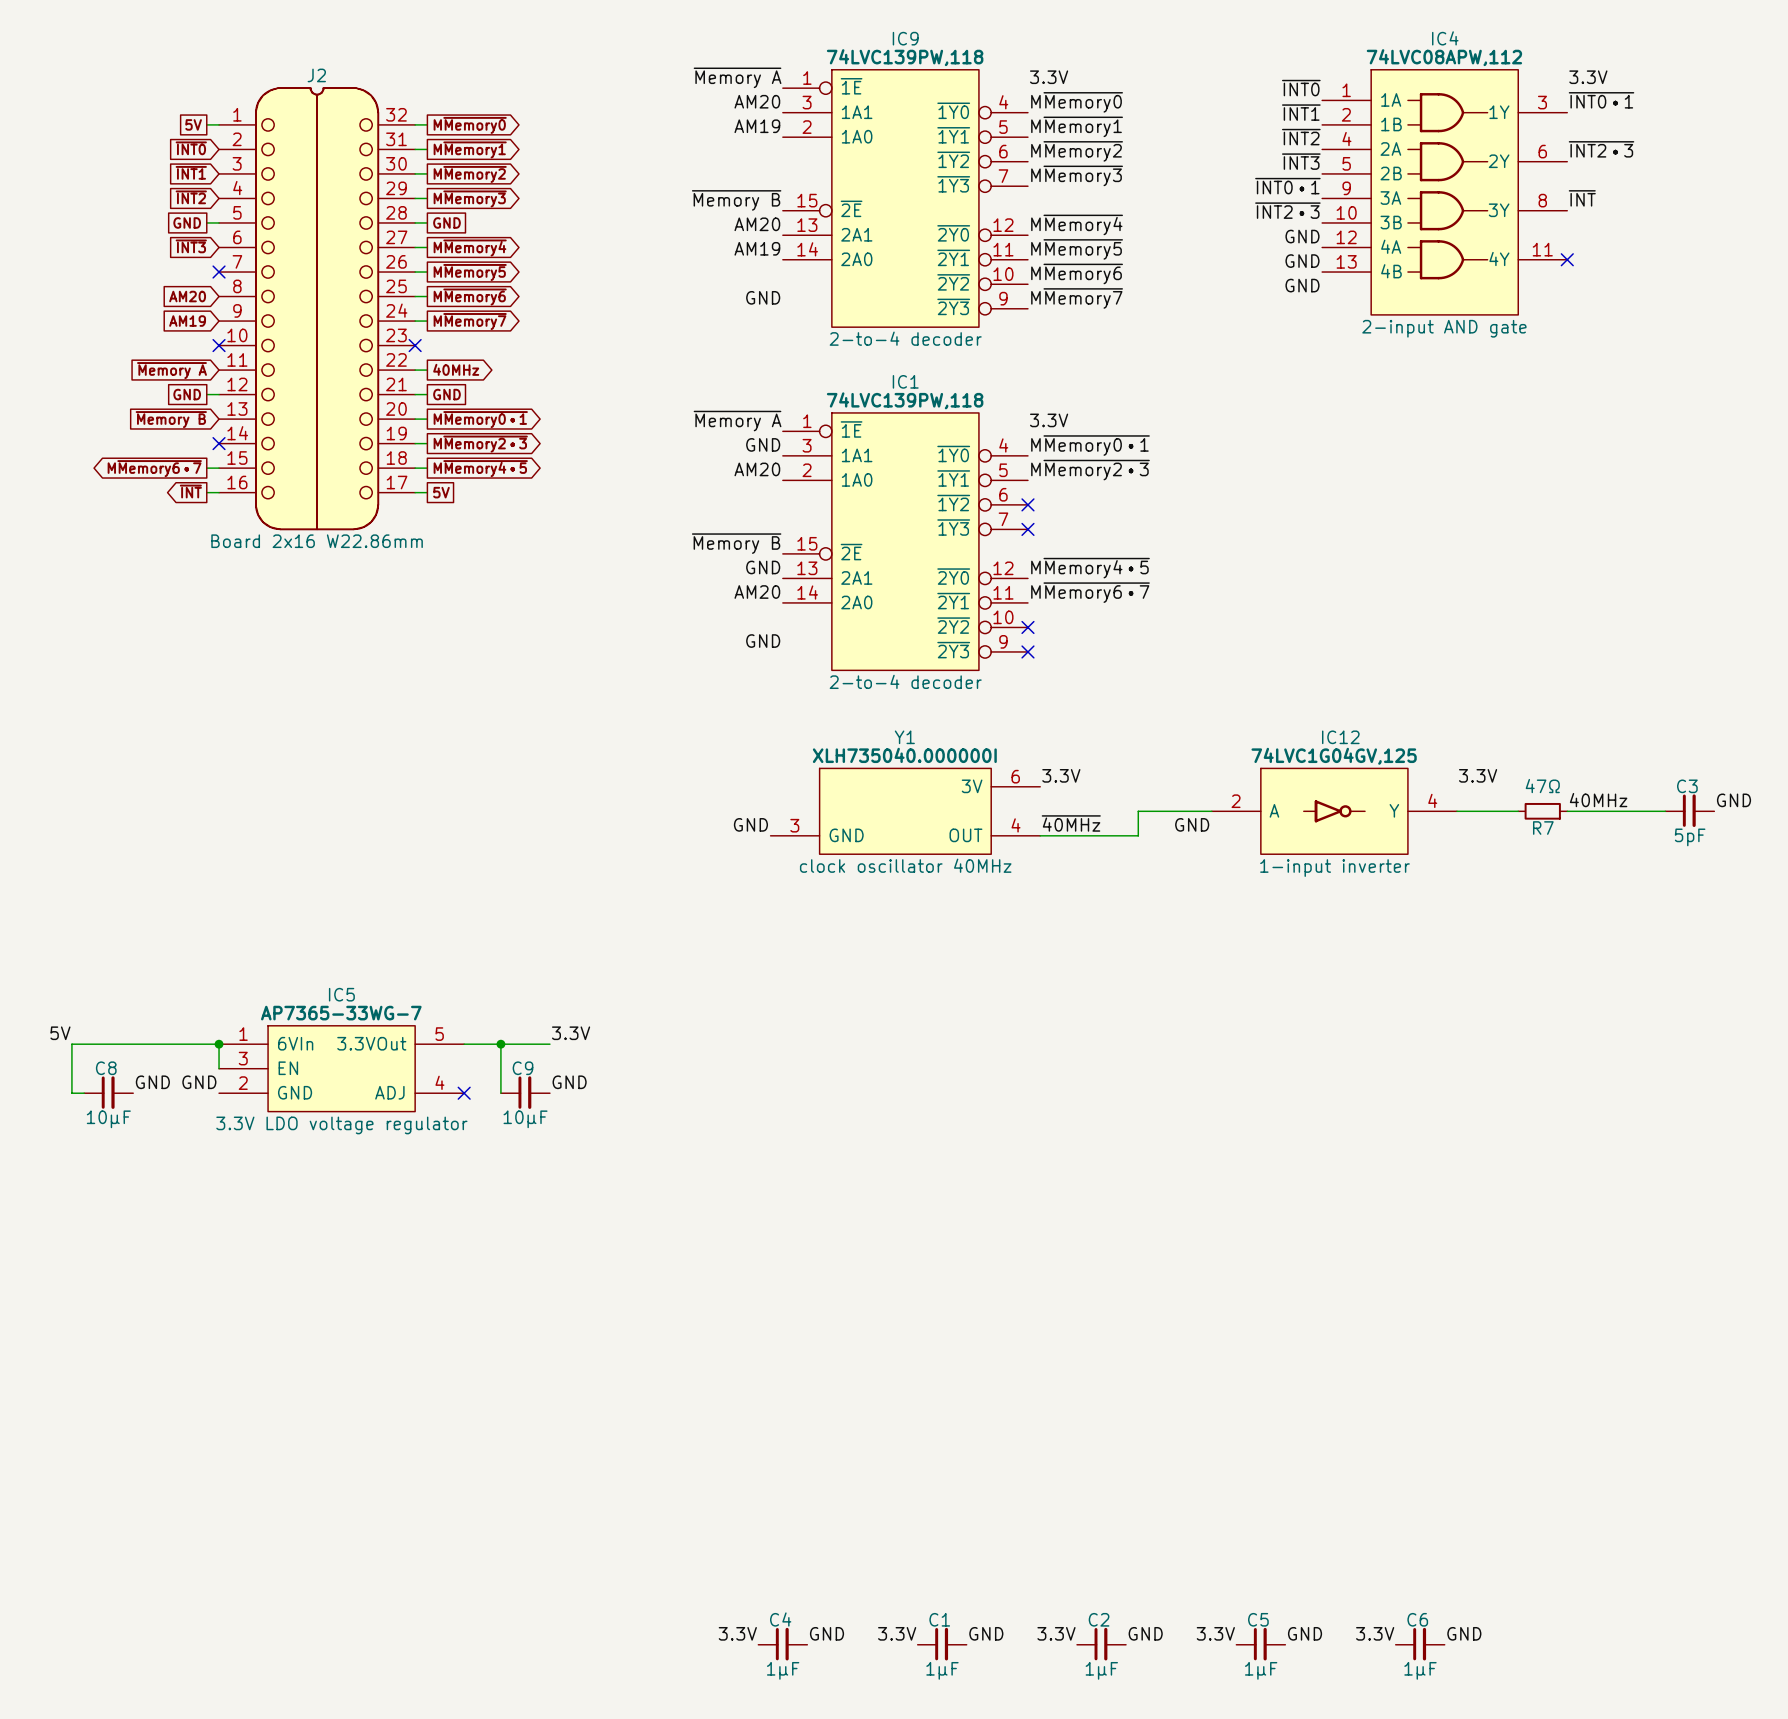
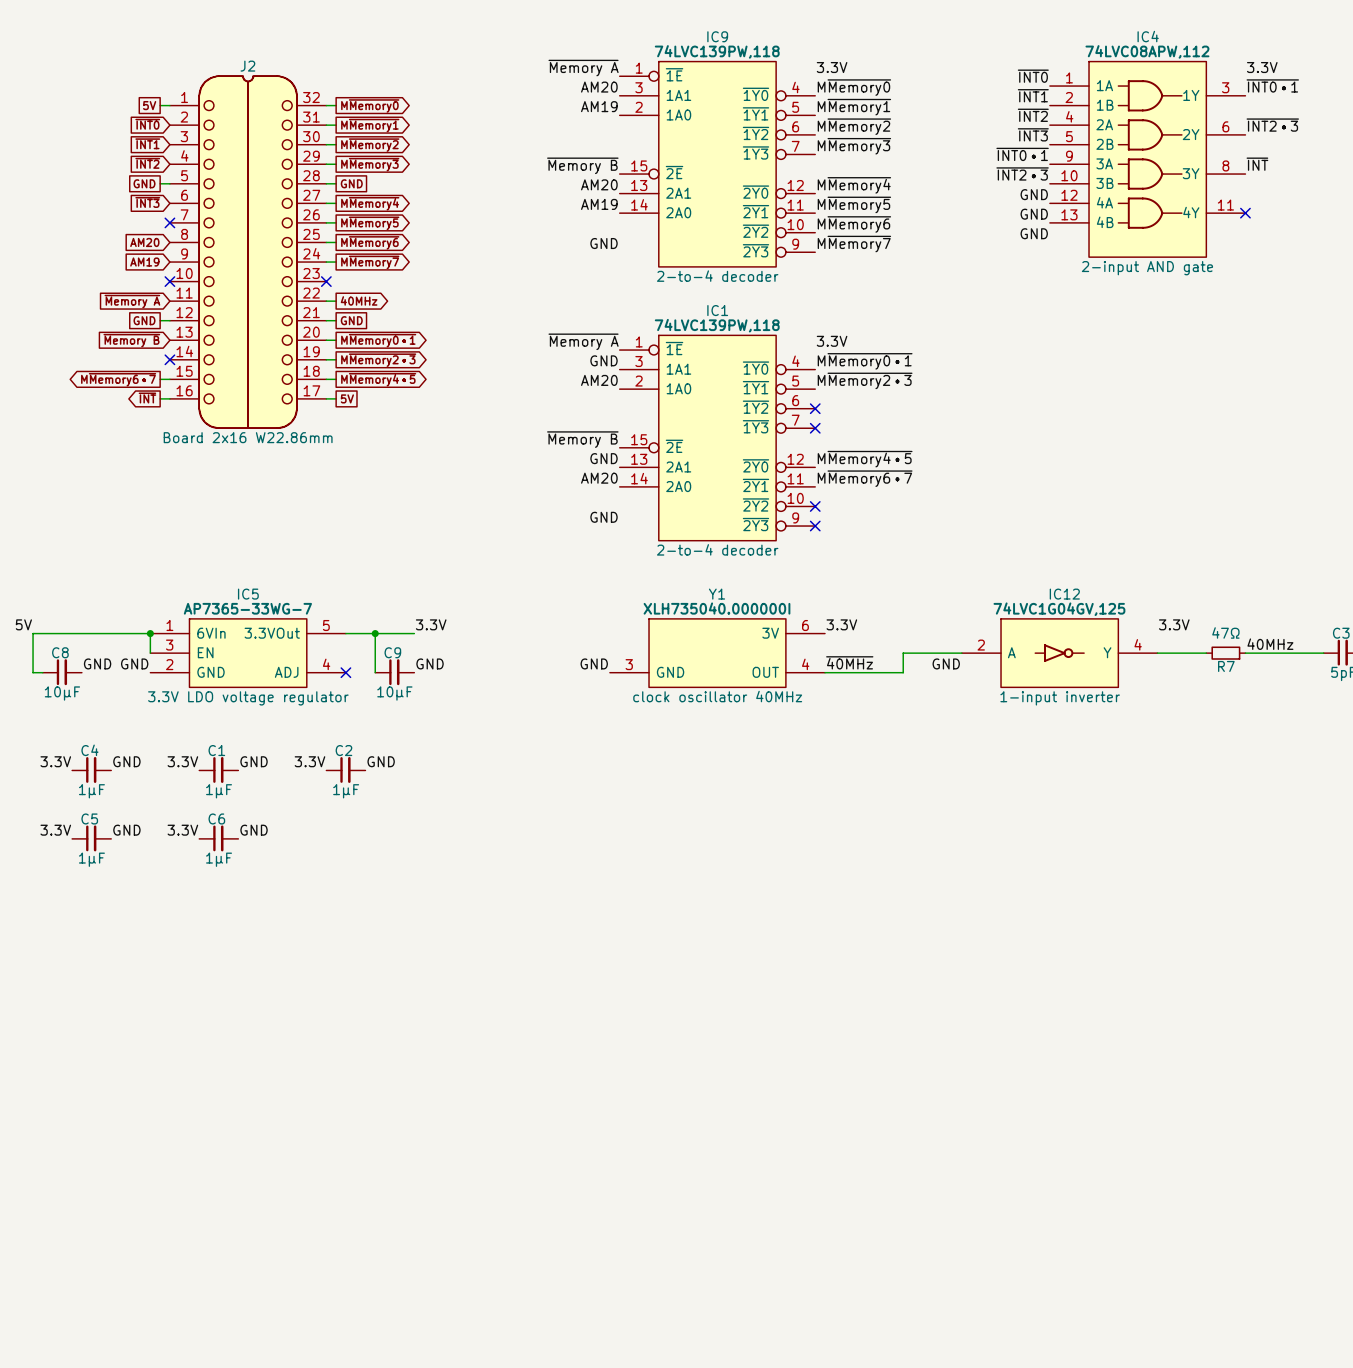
label: none -> 5V (23, 624)
label: none -> 3.3V (431, 624)
junction: none -> (150, 633)
wire: none -> (345, 633) (414, 633)
wire: none -> (375, 633) (375, 672)
junction: none -> (375, 633)
wire: none -> (150, 653) (150, 633) (33, 633) (33, 672) (42, 672)
label: none -> GND (97, 663)
label: none -> GND (134, 663)
label: none -> GND (430, 663)
no-connect mark: none -> (345, 672)
label: none -> 3.3V (55, 761)
label: none -> GND (126, 761)
label: none -> 3.3V (182, 761)
label: none -> GND (254, 761)
label: none -> 3.3V (309, 761)
label: none -> GND (381, 761)
label: 5V (60, 1033) -> none
label: none -> 3.3V (55, 830)
label: none -> GND (126, 830)
label: none -> 3.3V (182, 830)
label: none -> GND (254, 830)
label: 3.3V (571, 1033) -> none
junction: (219, 1044) -> none
wire: (464, 1044) (549, 1044) -> none
wire: (500, 1044) (500, 1093) -> none
junction: (500, 1044) -> none
wire: (219, 1068) (219, 1044) (71, 1044) (71, 1093) (84, 1093) -> none
IC5 position: (341, 1068) -> (248, 653)
label: GND (152, 1082) -> none
label: GND (199, 1082) -> none
label: GND (569, 1082) -> none
C8 position: (108, 1092) -> (62, 672)
C9 position: (525, 1092) -> (394, 672)
no-connect mark: (464, 1093) -> none
label: 3.3V (737, 1633) -> none
label: GND (827, 1633) -> none
label: 3.3V (897, 1633) -> none
label: GND (986, 1633) -> none
label: 3.3V (1056, 1633) -> none
label: GND (1145, 1633) -> none
label: 3.3V (1215, 1633) -> none
label: GND (1305, 1633) -> none
label: 3.3V (1375, 1633) -> none
label: GND (1464, 1633) -> none
C4 position: (782, 1644) -> (91, 769)
C1 position: (942, 1644) -> (218, 769)
C2 position: (1101, 1644) -> (345, 769)
C5 position: (1260, 1644) -> (91, 838)
C6 position: (1420, 1644) -> (218, 838)

